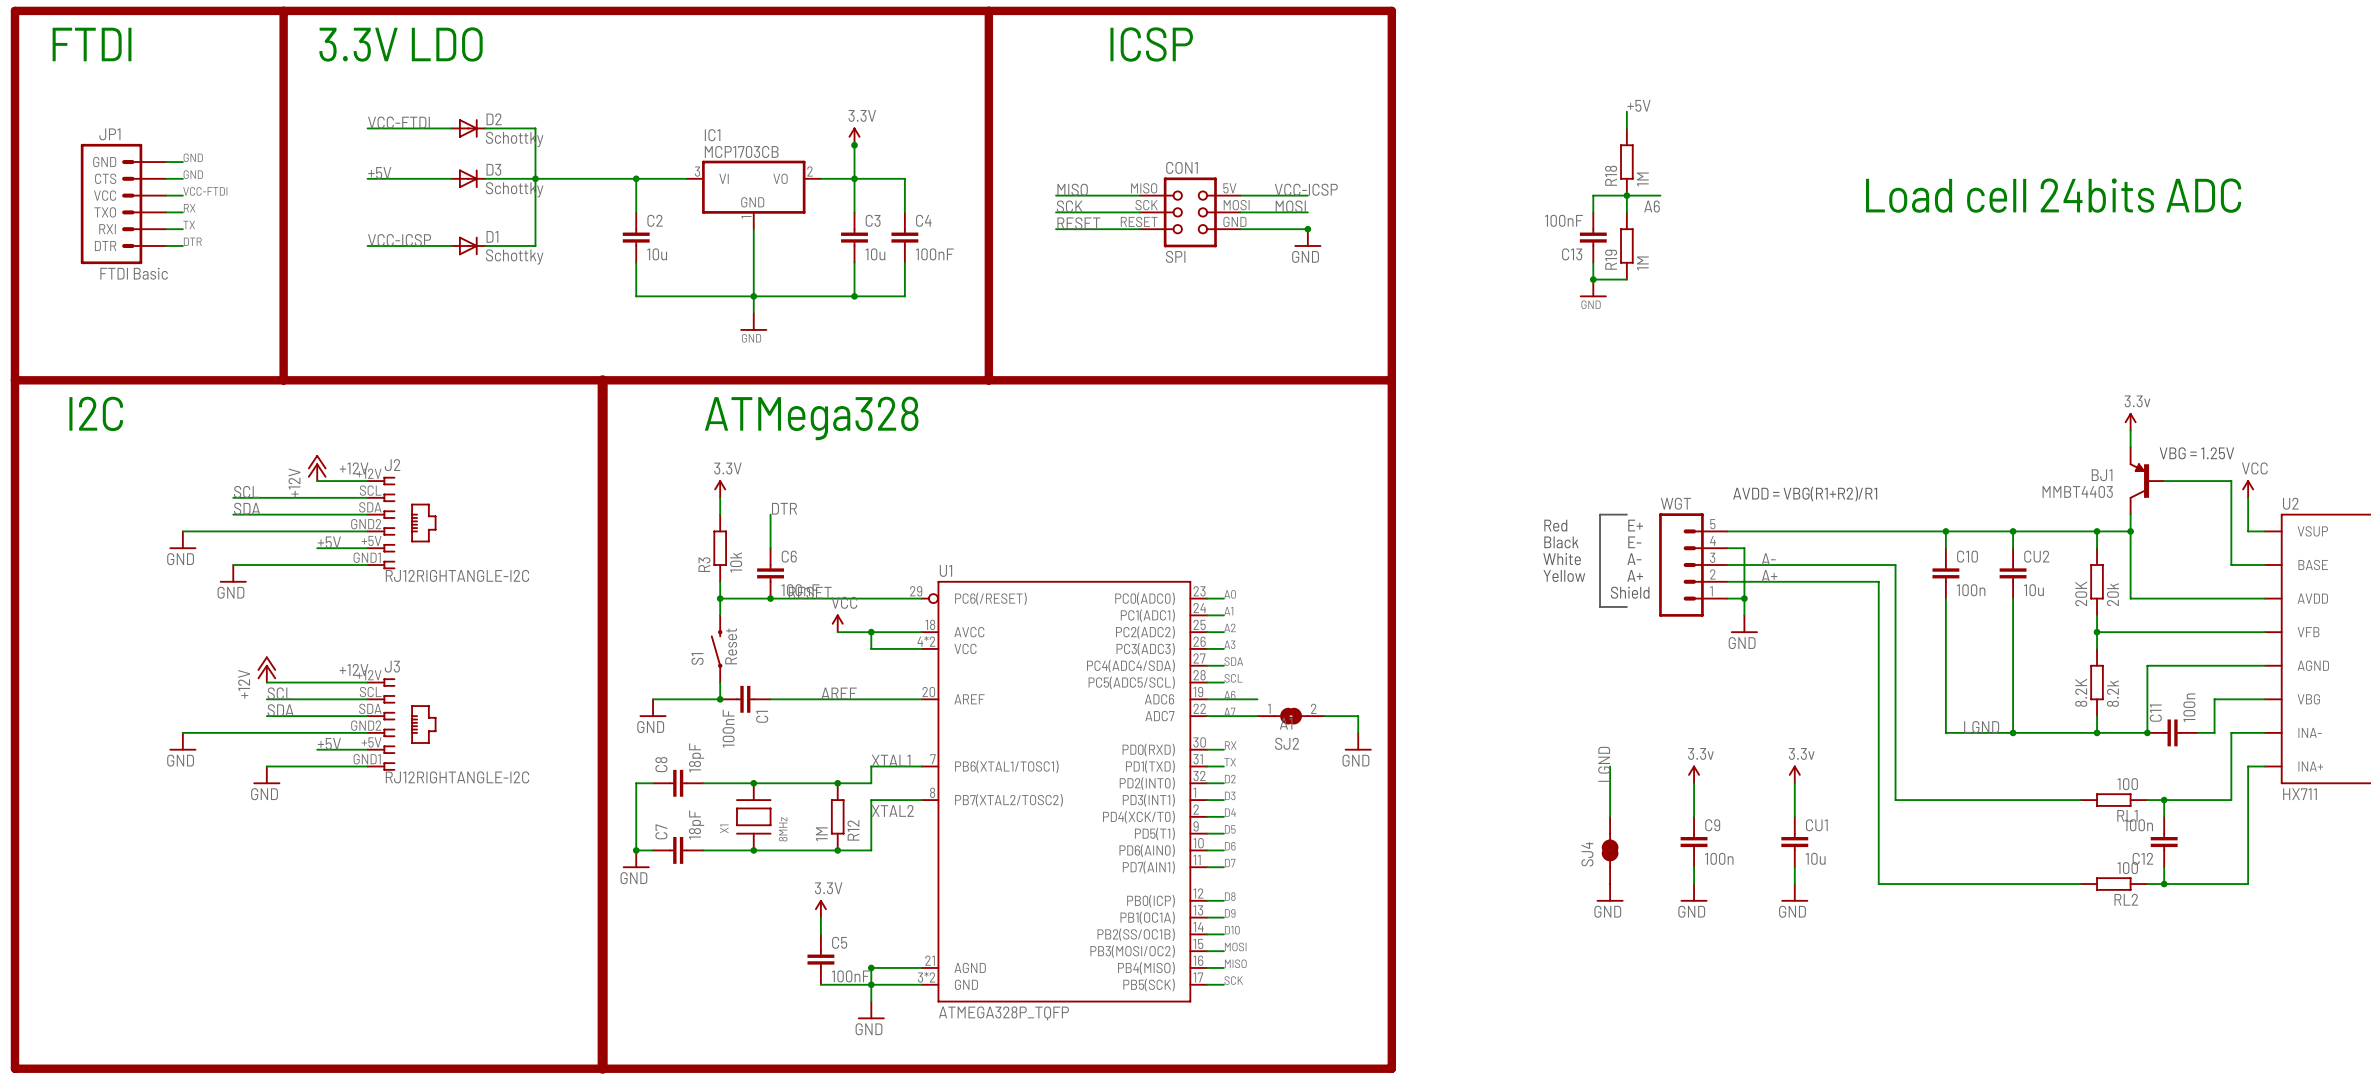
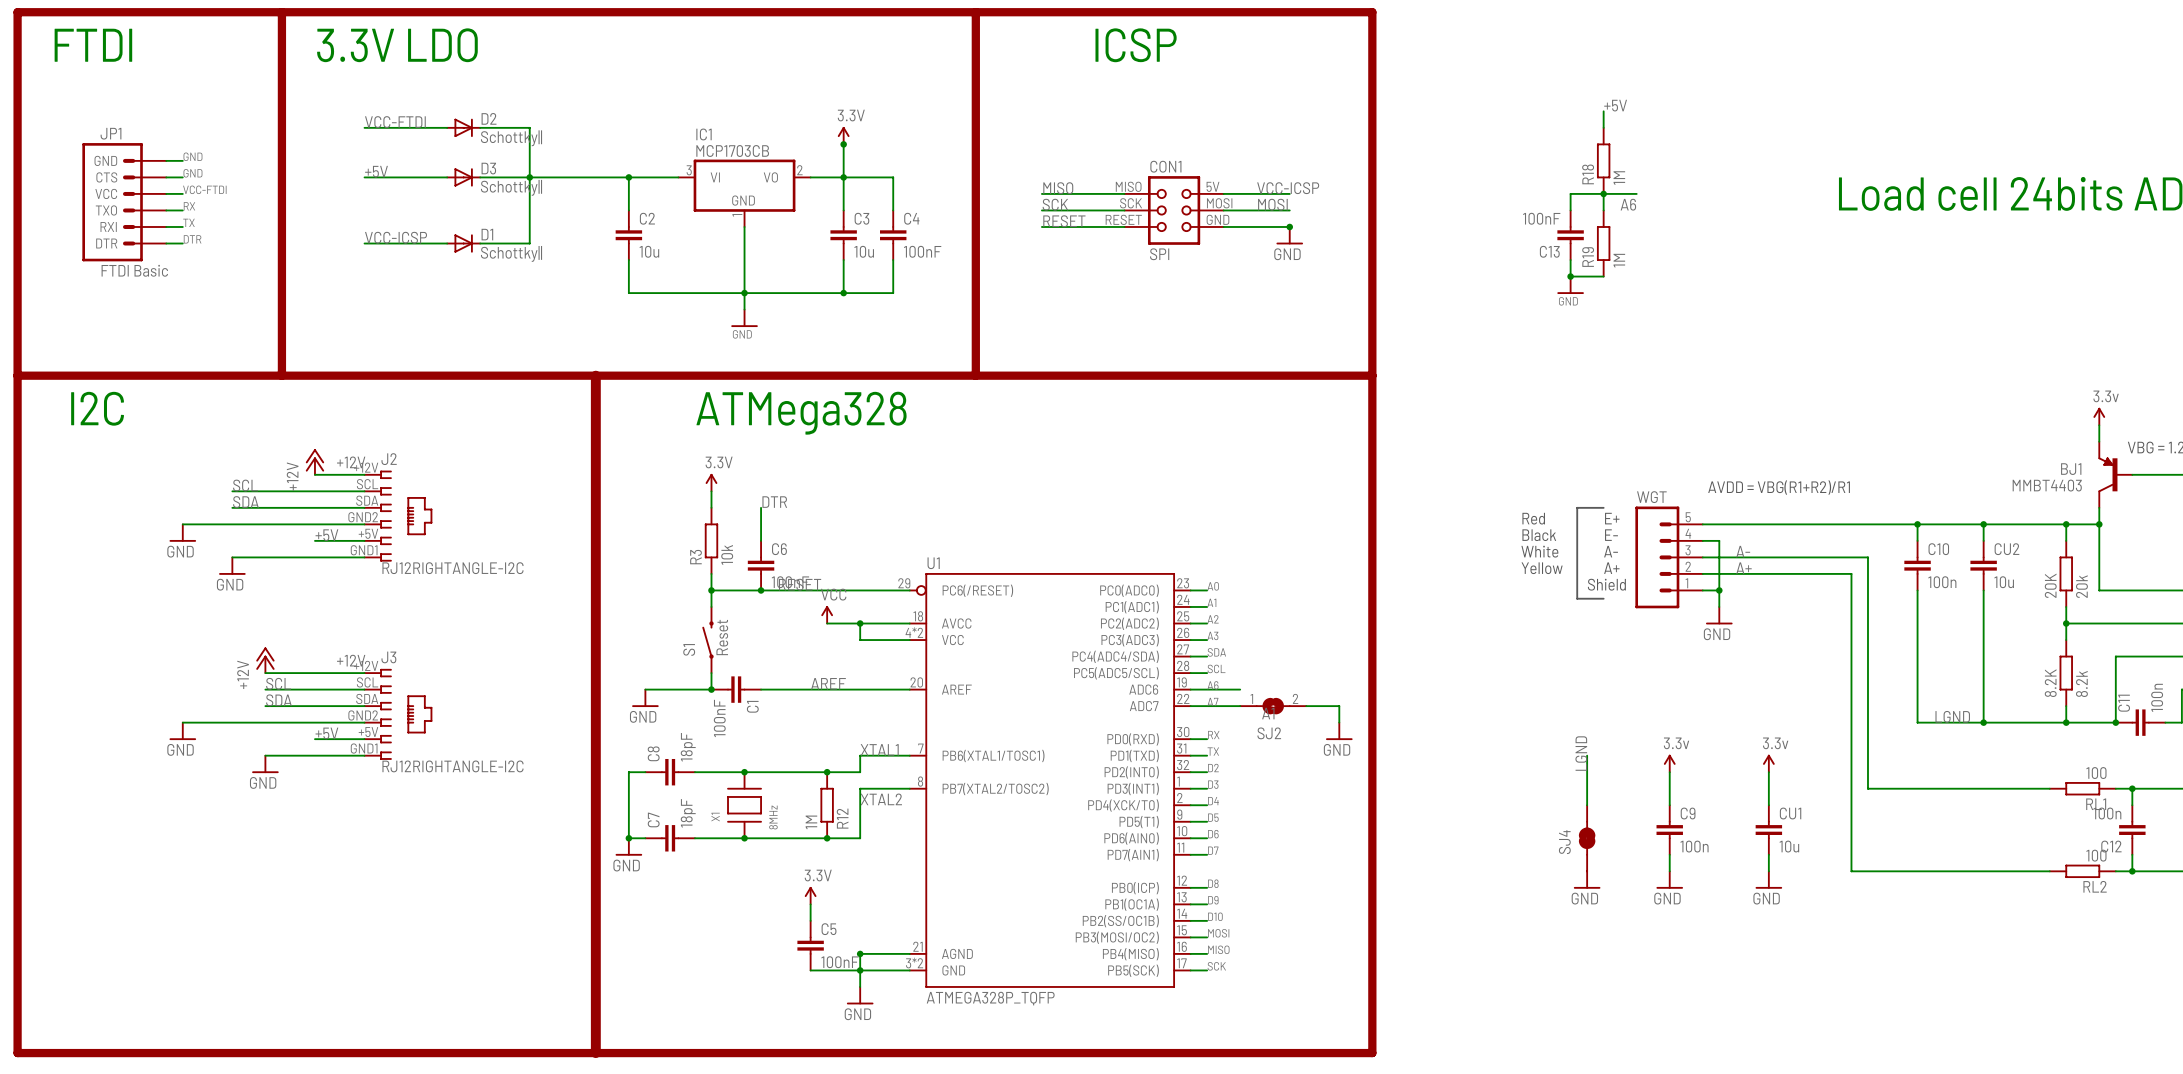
D2 value: Schottky (514, 139) -> Schottky|| (511, 138)
D3 value: Schottky (514, 189) -> Schottky|| (511, 187)
D1 value: Schottky (514, 256) -> Schottky|| (511, 253)

